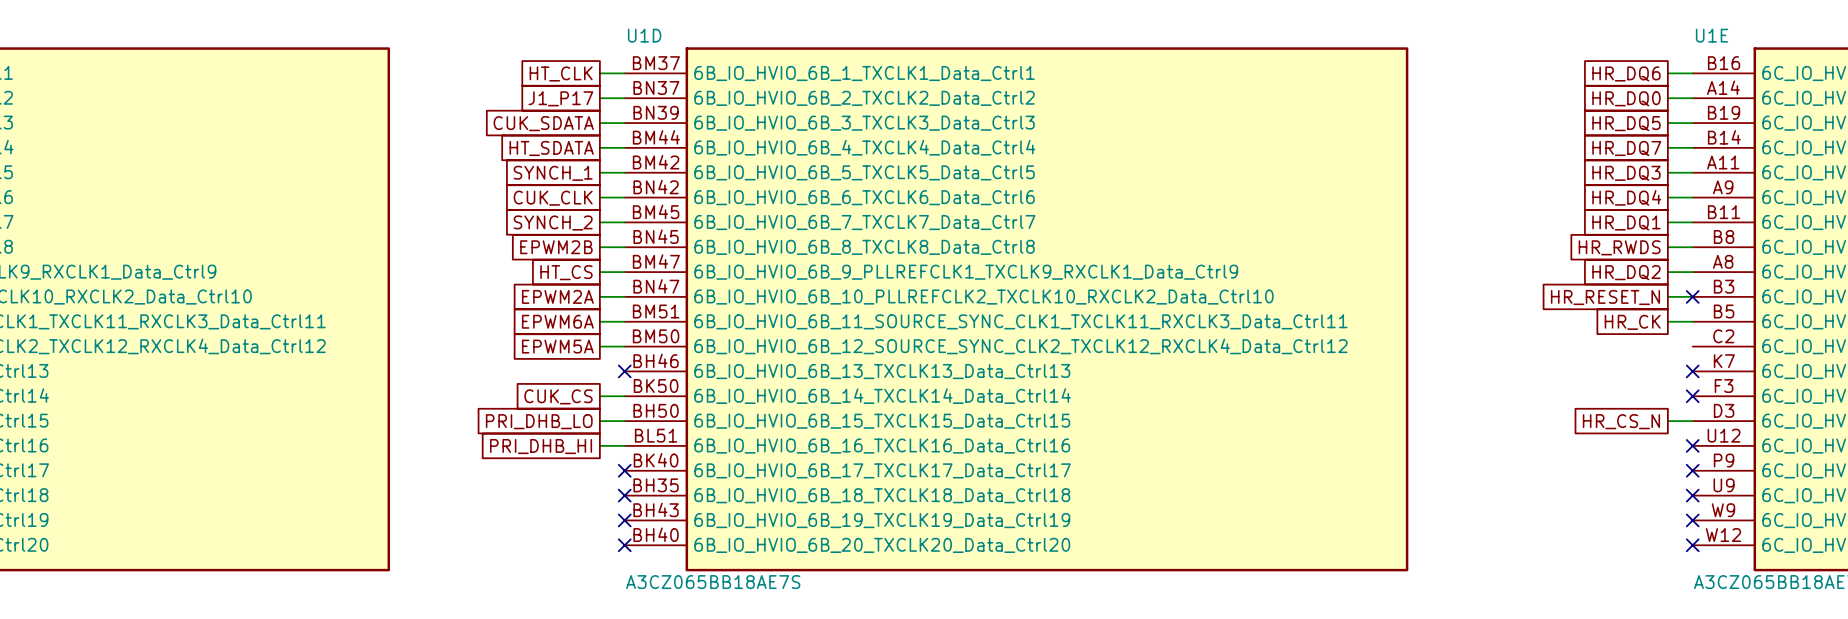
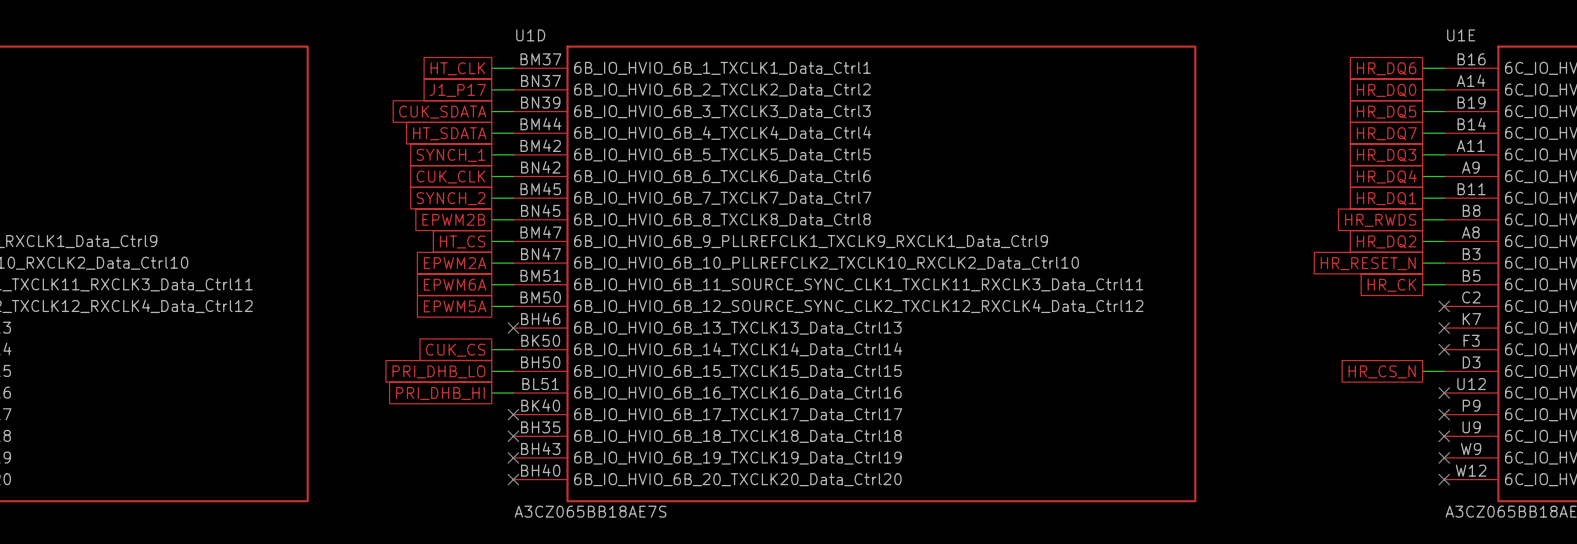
no-connect mark position: (1692, 296) -> (1444, 306)

